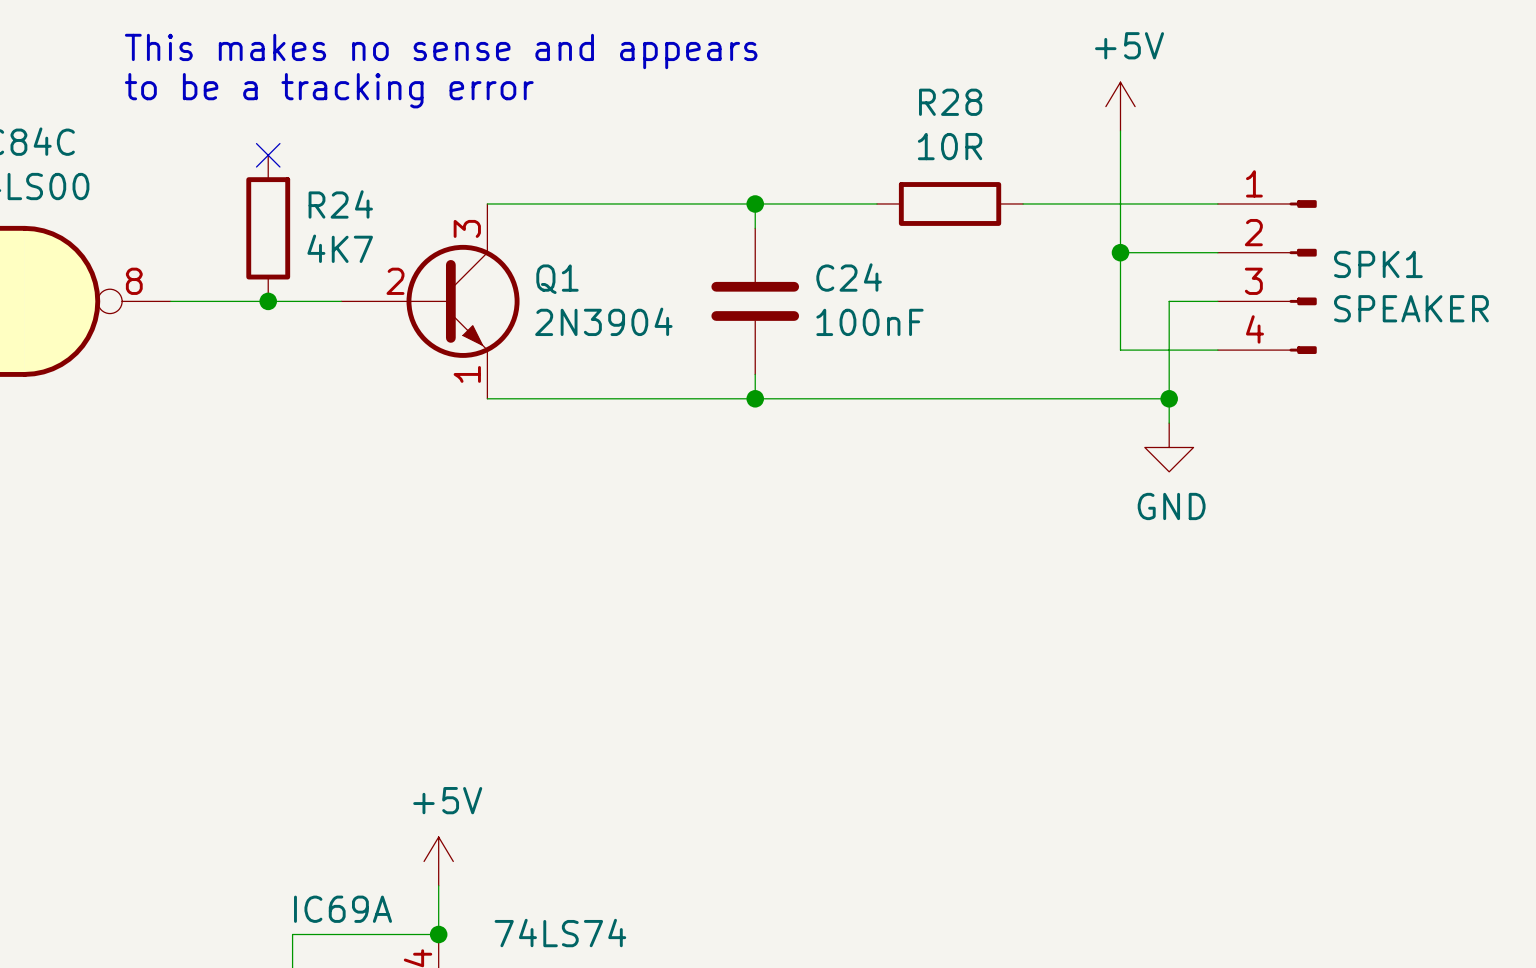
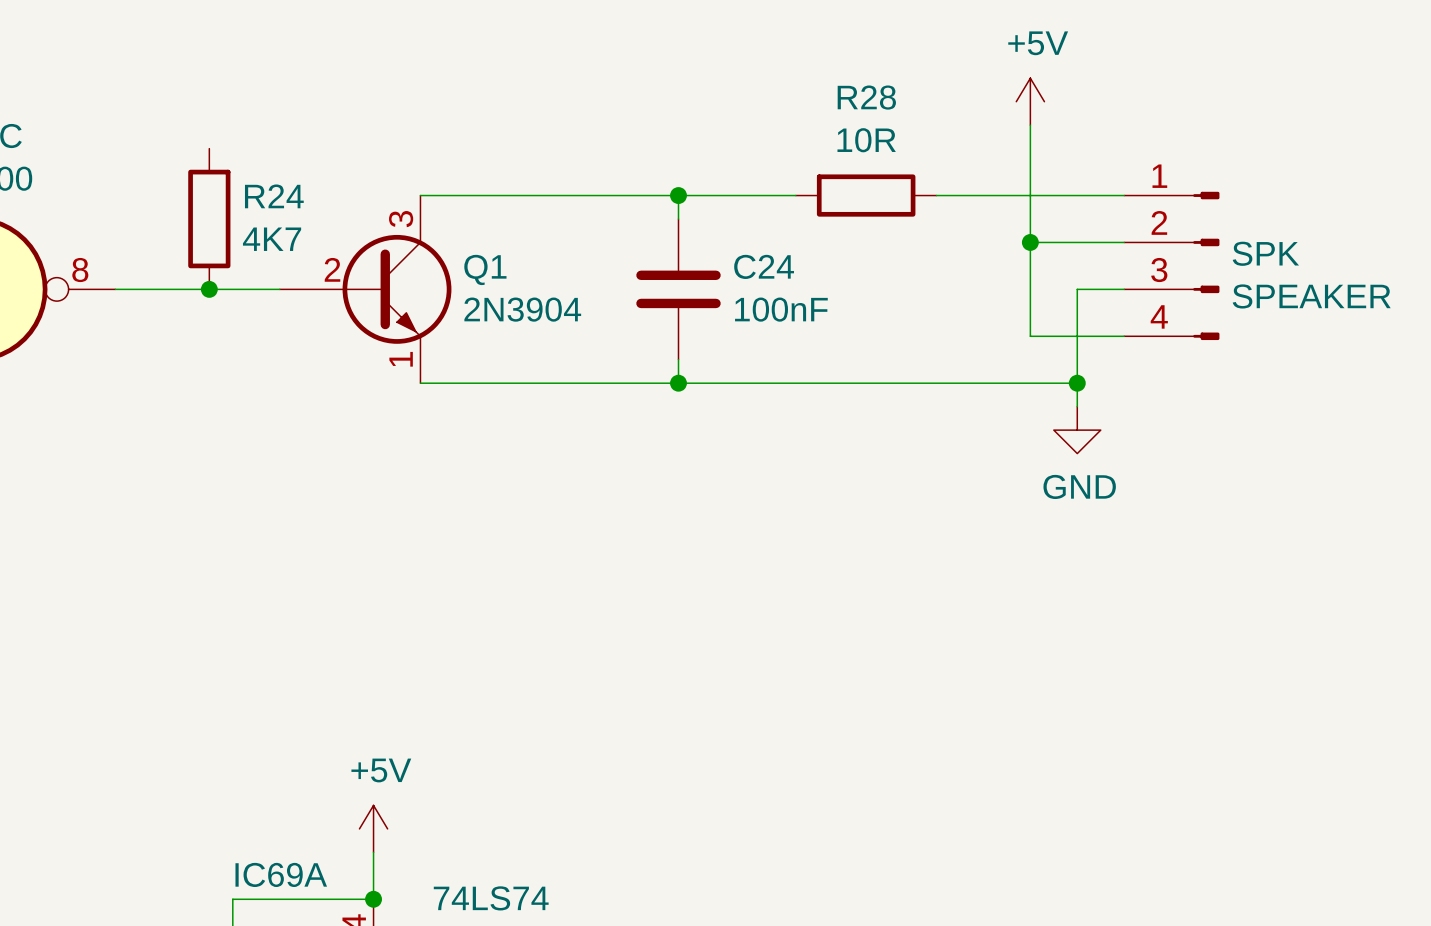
text: This makes no sense and appears (441, 51) -> none
text: to be a tracking error (329, 90) -> none
no-connect mark: (268, 155) -> none
SPK1 name: SPK1 (1378, 264) -> SPK (1265, 253)

